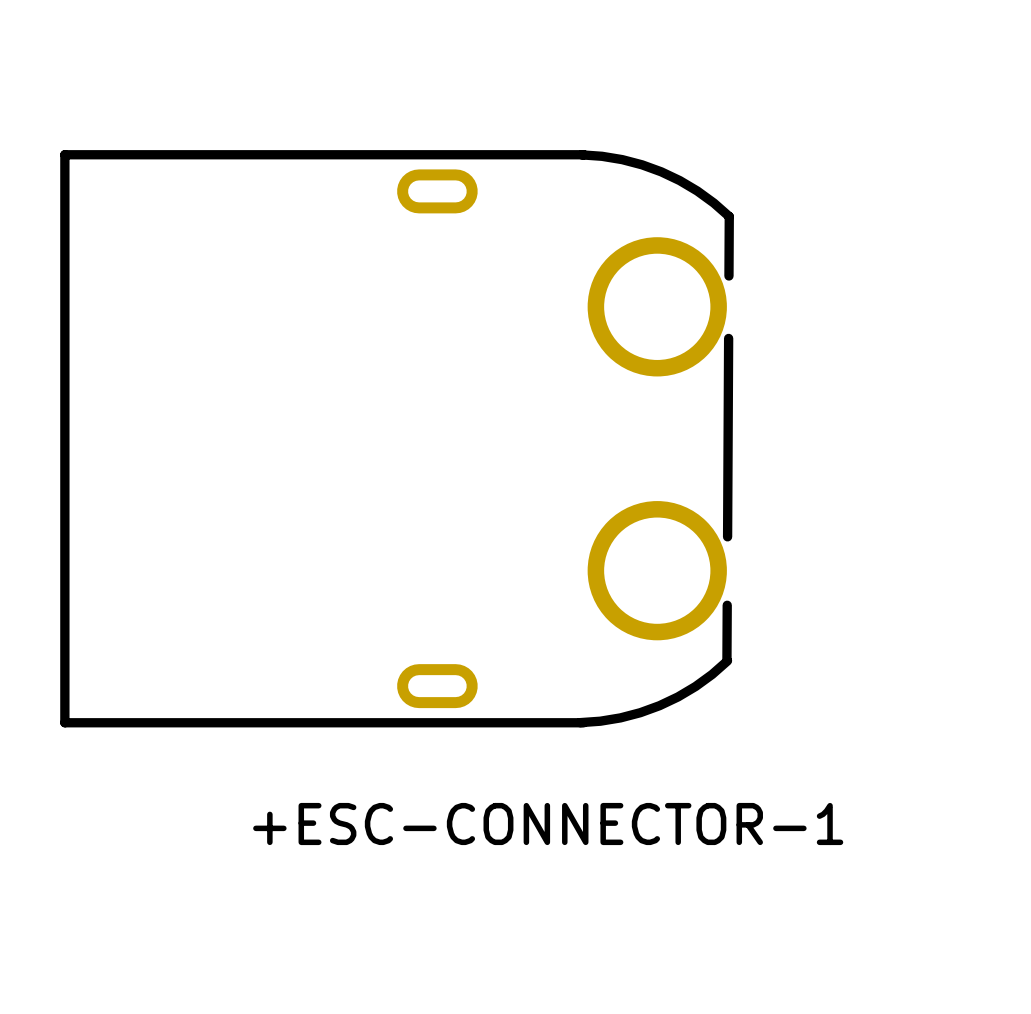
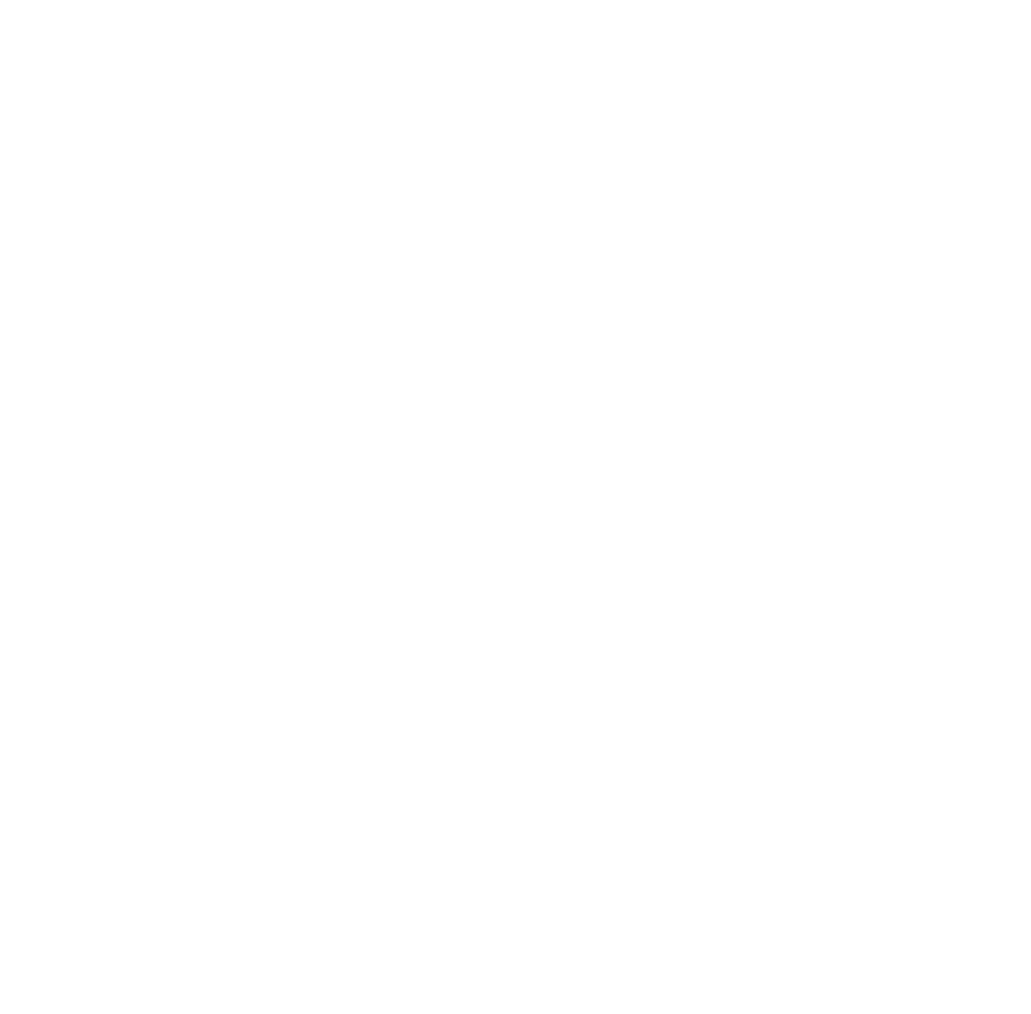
+ESC-CONNECTOR-1: (397, 438) -> none

